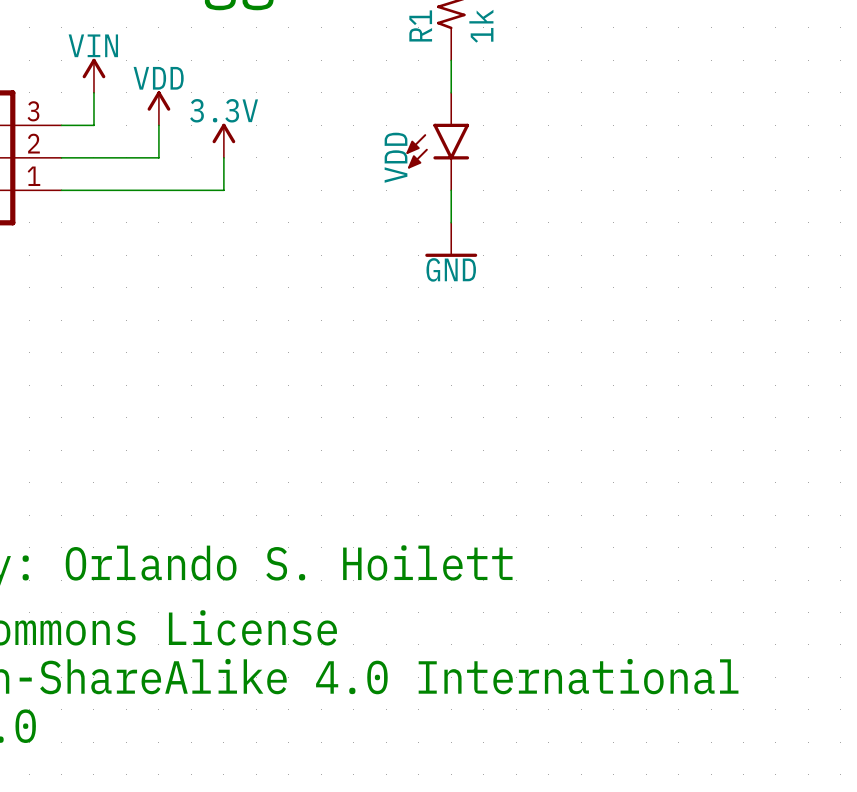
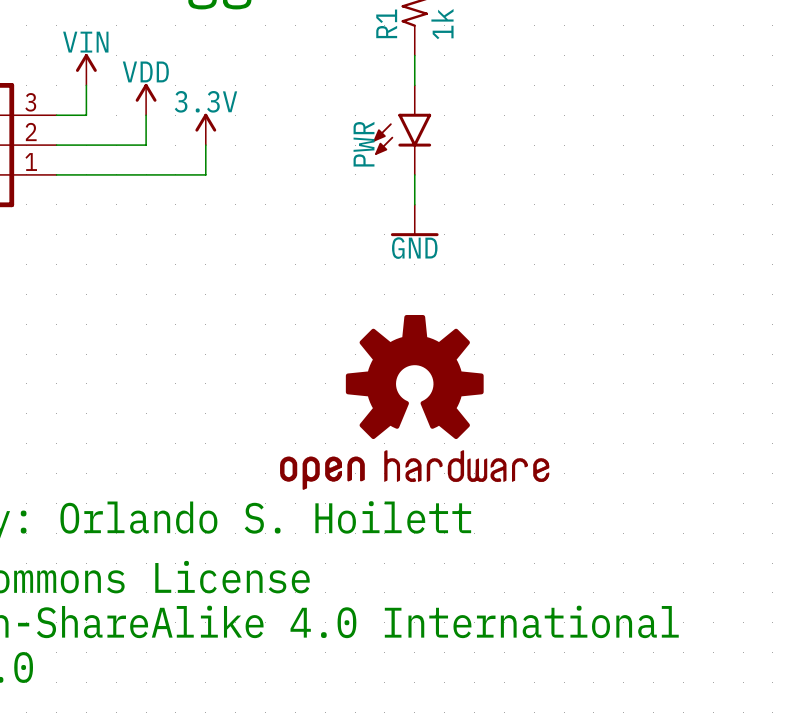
VDD name: VDD (396, 157) -> PWR (364, 144)
part: none -> (414, 402)

